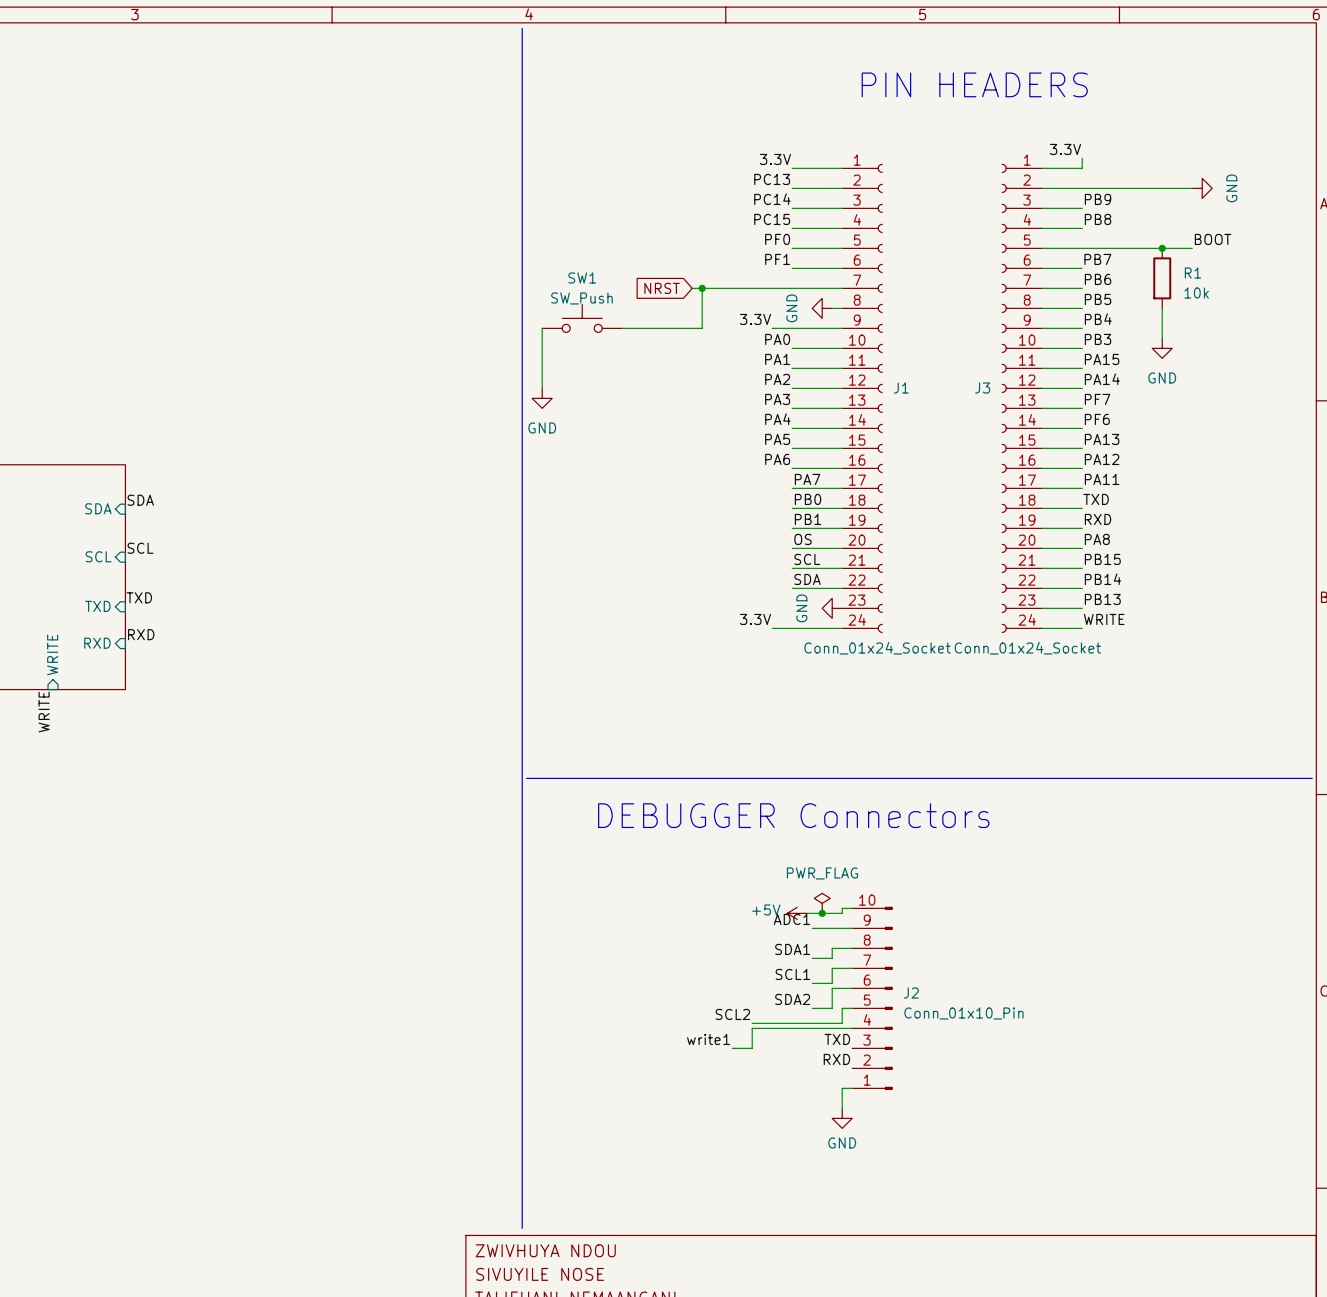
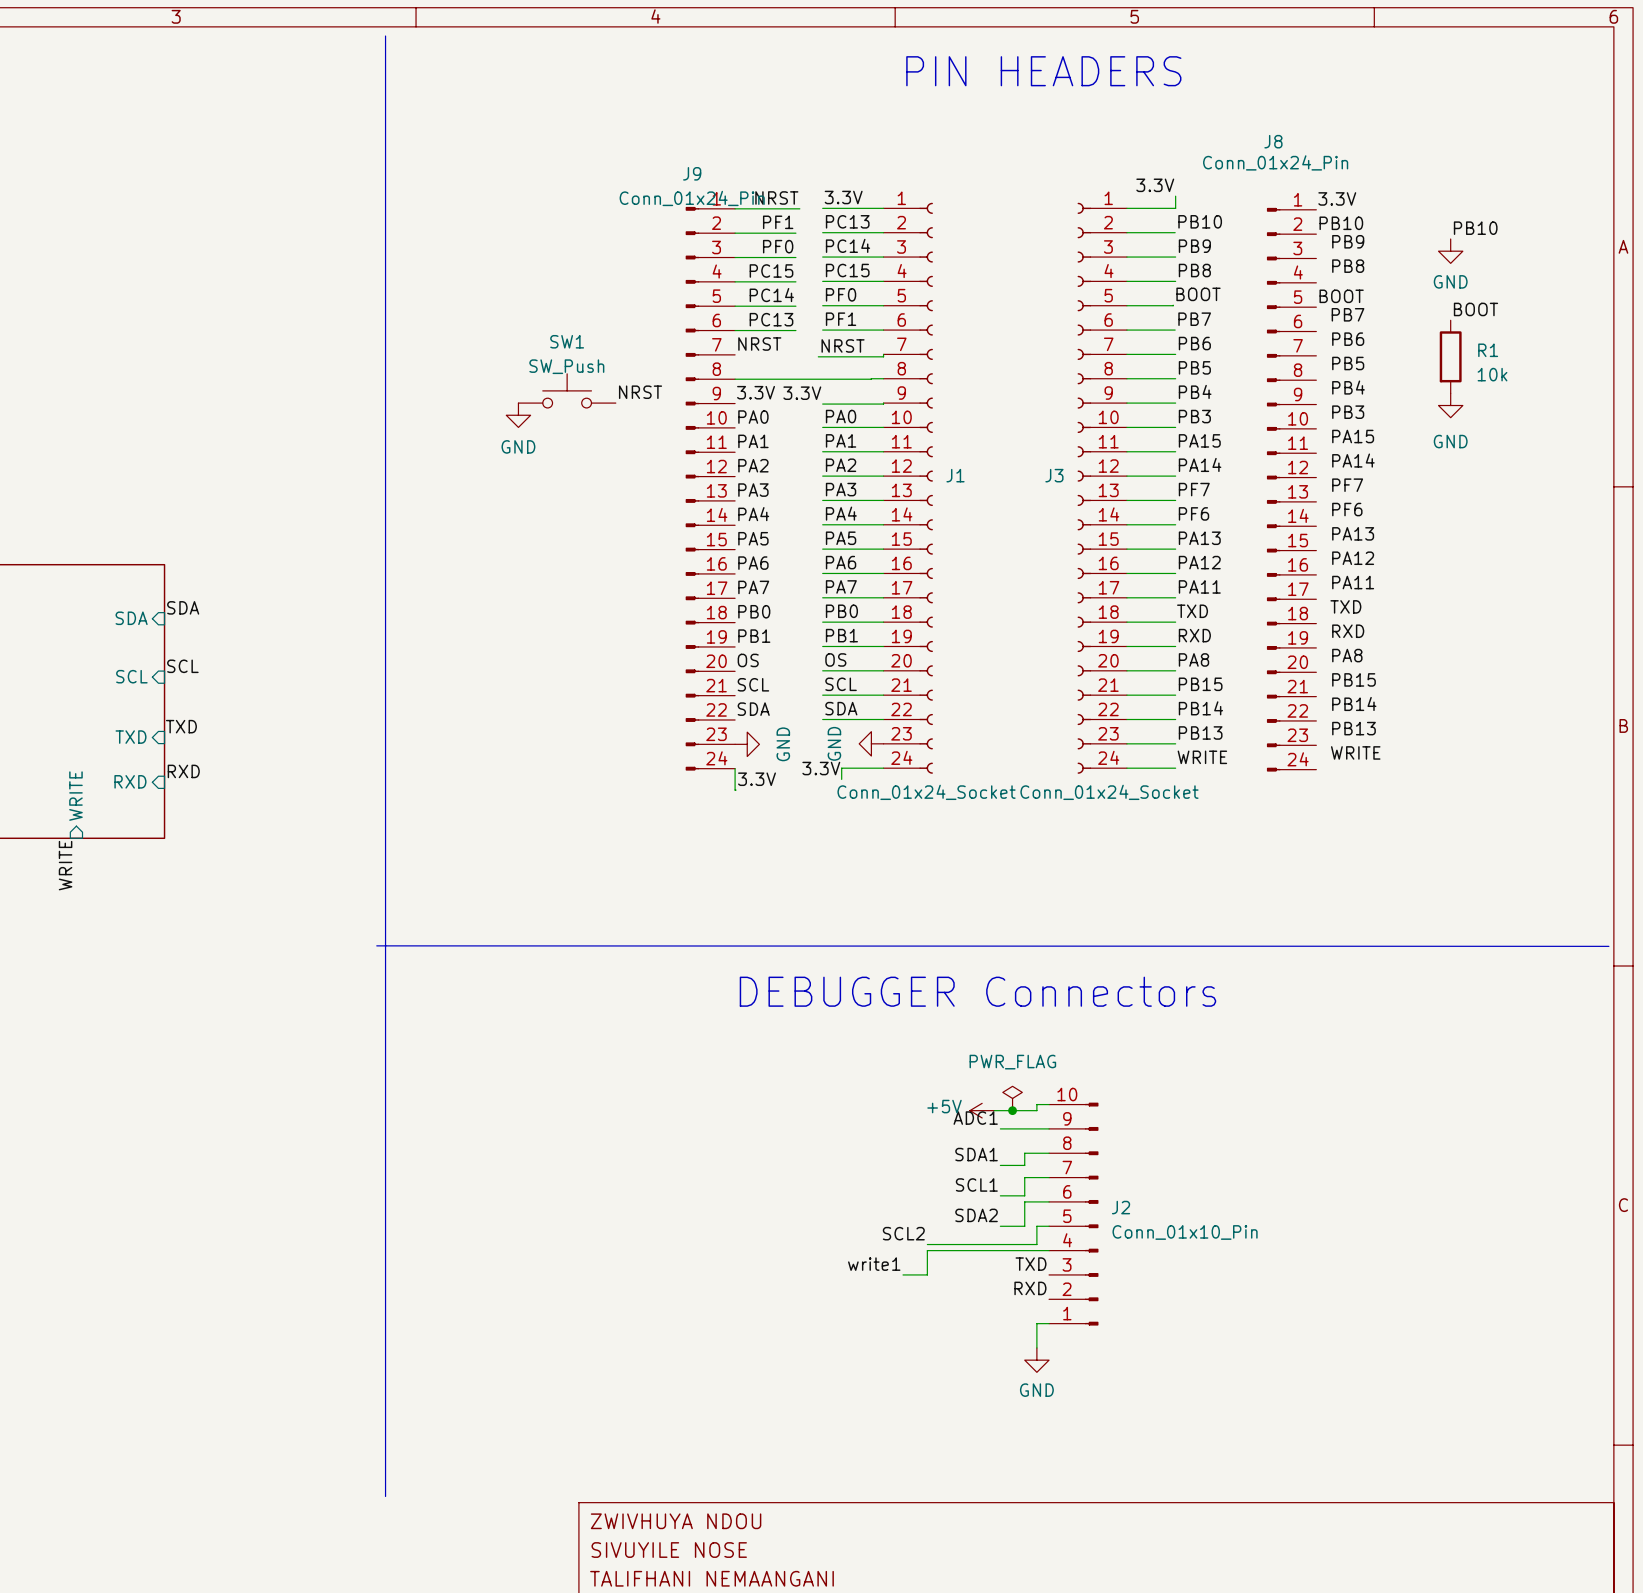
line: (522, 28) (522, 1228) -> none
line: none -> (385, 36) (385, 1496)
text position: PIN HEADERS (974, 84) -> PIN HEADERS (1043, 71)
label position: 3.3V (1065, 149) -> 3.3V (1337, 198)
label: none -> 3.3V (1155, 185)
wire: (1082, 158) (1082, 168) (1042, 168) -> (1175, 196) (1175, 208) (1126, 208)
label: 3.3V (775, 159) -> none
label: none -> NRST (776, 197)
label: none -> 3.3V (843, 197)
wire: (792, 168) (842, 168) -> (822, 208) (883, 208)
wire: none -> (735, 208) (799, 208)
label: PC13 (772, 179) -> none
label: none -> PF1 (778, 222)
label: none -> PC13 (847, 221)
label: none -> PB10 (1200, 221)
label: none -> PB10 (1341, 223)
wire: (792, 188) (842, 188) -> (822, 232) (883, 232)
wire: (1042, 188) (1192, 188) -> none
label: none -> PB10 (1475, 228)
power symbol rotation: 0° (1202, 188) -> 90° clockwise (1450, 251)
power symbol position: GND (1202, 188) -> GND (1450, 251)
wire: none -> (1126, 232) (1175, 232)
wire: none -> (735, 233) (795, 233)
label: PC14 (772, 199) -> none
label: none -> PC14 (848, 245)
label: none -> PF0 (778, 246)
label: none -> PB9 (1194, 246)
wire: (792, 208) (842, 208) -> (822, 257) (883, 257)
wire: (1042, 208) (1082, 208) -> (1126, 257) (1175, 257)
wire: none -> (735, 257) (795, 257)
label: PC15 (772, 219) -> none
label: none -> PC15 (771, 271)
label: none -> PC15 (847, 270)
label: none -> PB8 (1194, 270)
wire: (792, 228) (842, 228) -> (822, 281) (883, 281)
wire: (1042, 228) (1082, 228) -> (1126, 281) (1175, 281)
wire: none -> (735, 281) (795, 281)
label: PF0 (777, 239) -> none
label position: BOOT (1213, 239) -> BOOT (1475, 309)
label: none -> BOOT (1198, 294)
label: none -> PC14 (771, 295)
label: none -> PF0 (841, 294)
label: none -> BOOT (1341, 296)
wire: (792, 248) (842, 248) -> (822, 305) (883, 305)
wire: (1042, 248) (1192, 248) -> none
junction: (1162, 248) -> none
wire: none -> (1173, 305) (1126, 305)
wire: none -> (735, 306) (795, 306)
label: PF1 (777, 259) -> none
label: none -> PC13 (771, 319)
label: none -> PF1 (841, 319)
label: none -> PB7 (1194, 319)
wire: (792, 268) (842, 268) -> (822, 330) (883, 330)
wire: (1042, 268) (1081, 268) -> (1126, 330) (1175, 330)
wire: none -> (735, 330) (795, 330)
R1 position: (1162, 278) -> (1450, 356)
label: none -> NRST (759, 344)
label: none -> PB6 (1194, 343)
label: none -> NRST (843, 345)
global label: NRST (662, 288) -> none
wire: (692, 288) (842, 288) -> none
wire: (702, 288) (702, 328) (622, 328) -> none
junction: (702, 288) -> none
wire: (1042, 288) (1082, 288) -> (1126, 354) (1175, 354)
wire: none -> (883, 354) (883, 356) (818, 356)
label: none -> PB5 (1194, 367)
power symbol: GND (822, 308) -> none
wire: (832, 308) (842, 308) -> none
wire: (1042, 308) (1082, 308) -> (1126, 378) (1175, 378)
wire: (1162, 308) (1162, 338) -> none
wire: none -> (883, 378) (735, 379)
SW1 position: (582, 318) -> (567, 390)
label: 3.3V (755, 319) -> none
label: none -> PB4 (1195, 391)
label: none -> NRST (640, 392)
label: none -> 3.3V (756, 392)
label: none -> 3.3V (802, 393)
wire: (542, 328) (542, 388) -> none
wire: (772, 328) (842, 328) -> none
wire: (1042, 328) (1082, 328) -> (1126, 403) (1175, 403)
wire: none -> (883, 403) (822, 404)
label: PA0 (777, 339) -> none
power symbol: none -> GND (518, 415)
label: none -> PA0 (753, 417)
label: none -> PA0 (841, 416)
label: none -> PB3 (1194, 416)
wire: (792, 348) (842, 348) -> (822, 427) (883, 427)
wire: (1042, 348) (1082, 348) -> (1126, 427) (1175, 427)
power symbol position: GND (1162, 348) -> GND (1450, 405)
label: PA1 (777, 359) -> none
label: none -> PA1 (753, 441)
label: none -> PA1 (841, 440)
label: none -> PA15 (1199, 440)
wire: (792, 368) (842, 368) -> (822, 451) (883, 451)
wire: (1042, 368) (1082, 368) -> (1126, 451) (1175, 451)
label: PA2 (777, 379) -> none
label: none -> PA14 (1200, 464)
label: none -> PA2 (753, 465)
label: none -> PA2 (841, 465)
wire: (792, 388) (842, 388) -> (822, 476) (883, 476)
wire: (1042, 388) (1082, 388) -> (1126, 476) (1175, 476)
power symbol: GND (542, 398) -> none
J1 position: (862, 398) -> (908, 488)
J3 position: (1021, 398) -> (1102, 488)
label: PA3 (777, 399) -> none
J9: none -> Conn_01x24_Pin (710, 488)
label: none -> PA3 (753, 490)
label: none -> PA3 (841, 489)
label: none -> PF7 (1194, 489)
J8: none -> Conn_01x24_Pin (1291, 489)
wire: (792, 408) (842, 408) -> (822, 500) (883, 500)
wire: (1042, 408) (1082, 408) -> (1126, 500) (1175, 500)
label: PA4 (777, 419) -> none
label: none -> PA4 (841, 513)
label: none -> PA4 (753, 514)
label: none -> PF6 (1193, 513)
wire: (792, 428) (842, 428) -> (822, 524) (883, 524)
wire: (1042, 428) (1082, 428) -> (1126, 524) (1175, 524)
label: PA5 (777, 439) -> none
label: none -> PA5 (753, 538)
label: none -> PA5 (841, 538)
label: none -> PA13 (1199, 538)
wire: (792, 448) (842, 448) -> (822, 549) (883, 549)
wire: (1042, 448) (1082, 448) -> (1126, 549) (1175, 549)
label: PA6 (777, 459) -> none
label: none -> PA6 (753, 563)
label: none -> PA6 (841, 562)
label: none -> PA12 (1199, 562)
wire: (792, 468) (842, 468) -> (822, 573) (883, 573)
wire: (1042, 468) (1082, 468) -> (1126, 573) (1175, 573)
label: PA7 (807, 479) -> none
label: none -> PA7 (753, 587)
label: none -> PA7 (841, 586)
label: none -> PA11 (1199, 586)
wire: (792, 488) (842, 488) -> (822, 597) (883, 597)
wire: (1042, 488) (1082, 488) -> (1126, 597) (1175, 597)
label: PB0 (808, 499) -> none
label: none -> PB0 (754, 611)
label: none -> PB0 (841, 611)
label: none -> TXD (1192, 611)
wire: (792, 508) (842, 508) -> (822, 622) (883, 622)
wire: (1042, 508) (1082, 508) -> (1126, 622) (1175, 622)
label: PB1 (808, 519) -> none
label: none -> PB1 (754, 636)
label: none -> PB1 (841, 635)
label: none -> RXD (1194, 635)
wire: (792, 528) (842, 528) -> (822, 646) (883, 646)
wire: (1042, 528) (1082, 528) -> (1126, 646) (1175, 646)
label: OS (803, 539) -> none
label: none -> OS (748, 660)
label: none -> OS (835, 659)
label: none -> PA8 (1193, 659)
wire: (792, 548) (842, 548) -> (822, 670) (883, 670)
wire: (1042, 548) (1082, 548) -> (1126, 670) (1175, 670)
label: SCL (807, 559) -> none
label: none -> SCL (753, 684)
label: none -> SCL (841, 684)
label: none -> PB15 (1200, 684)
wire: (792, 568) (842, 568) -> (822, 695) (883, 695)
wire: (1042, 568) (1082, 568) -> (1126, 695) (1175, 695)
label: SDA (807, 579) -> none
label: none -> PB14 (1200, 708)
label: none -> SDA (753, 709)
label: none -> SDA (841, 708)
wire: (792, 588) (842, 588) -> (822, 719) (883, 719)
wire: (1042, 588) (1082, 588) -> (1126, 719) (1175, 719)
label: none -> PB13 (1200, 732)
power symbol: GND (832, 608) -> none
wire: (1042, 608) (1082, 608) -> (1126, 743) (1175, 743)
power symbol: none -> GND (871, 743)
power symbol: none -> GND (747, 744)
label: 3.3V (755, 619) -> none
label: none -> WRITE (1202, 757)
wire: (772, 628) (842, 628) -> none
wire: (1042, 628) (1082, 628) -> (1126, 768) (1175, 768)
wire: none -> (883, 768) (841, 768) (841, 779)
wire: none -> (735, 768) (736, 790)
label: none -> 3.3V (821, 768)
label: none -> 3.3V (757, 779)
line: (526, 778) (1312, 778) -> (376, 945) (1608, 946)

